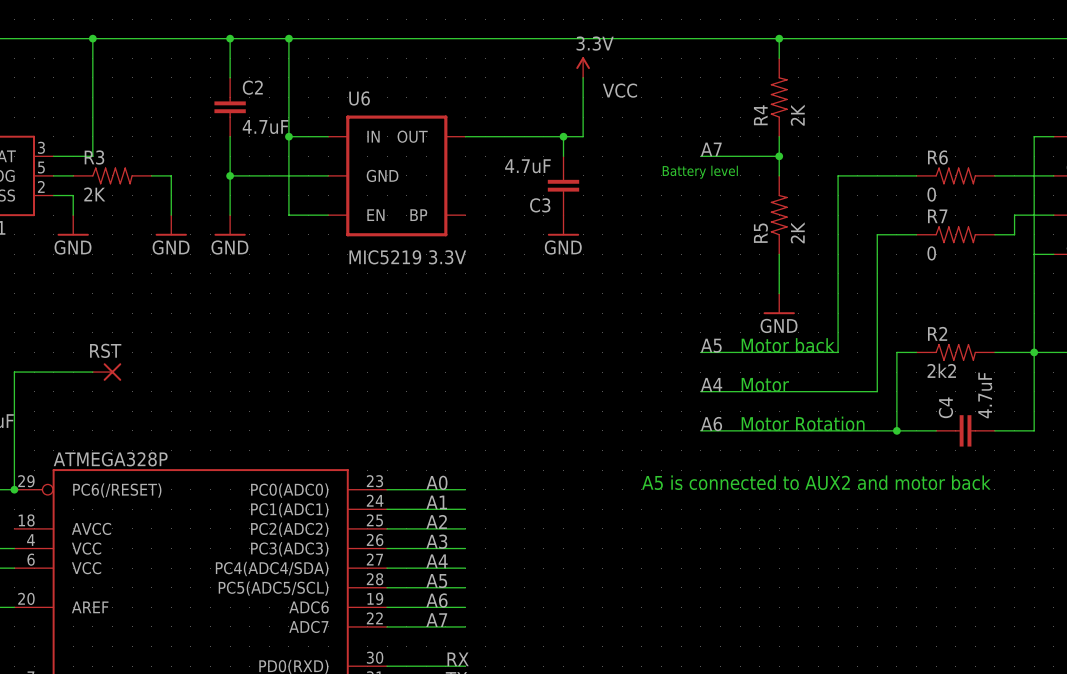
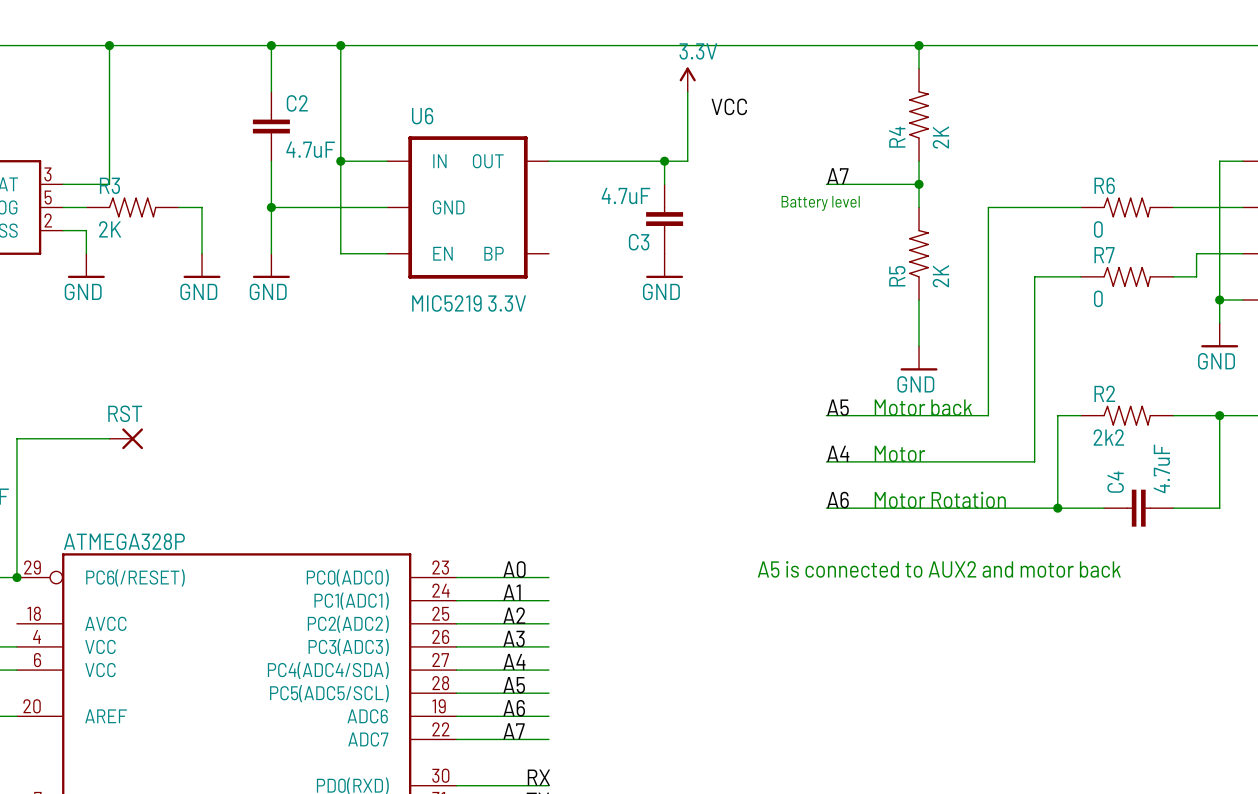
junction: none -> (1219, 300)
wire: (1034, 273) (1034, 352) -> none
power symbol: none -> GND (1219, 335)

